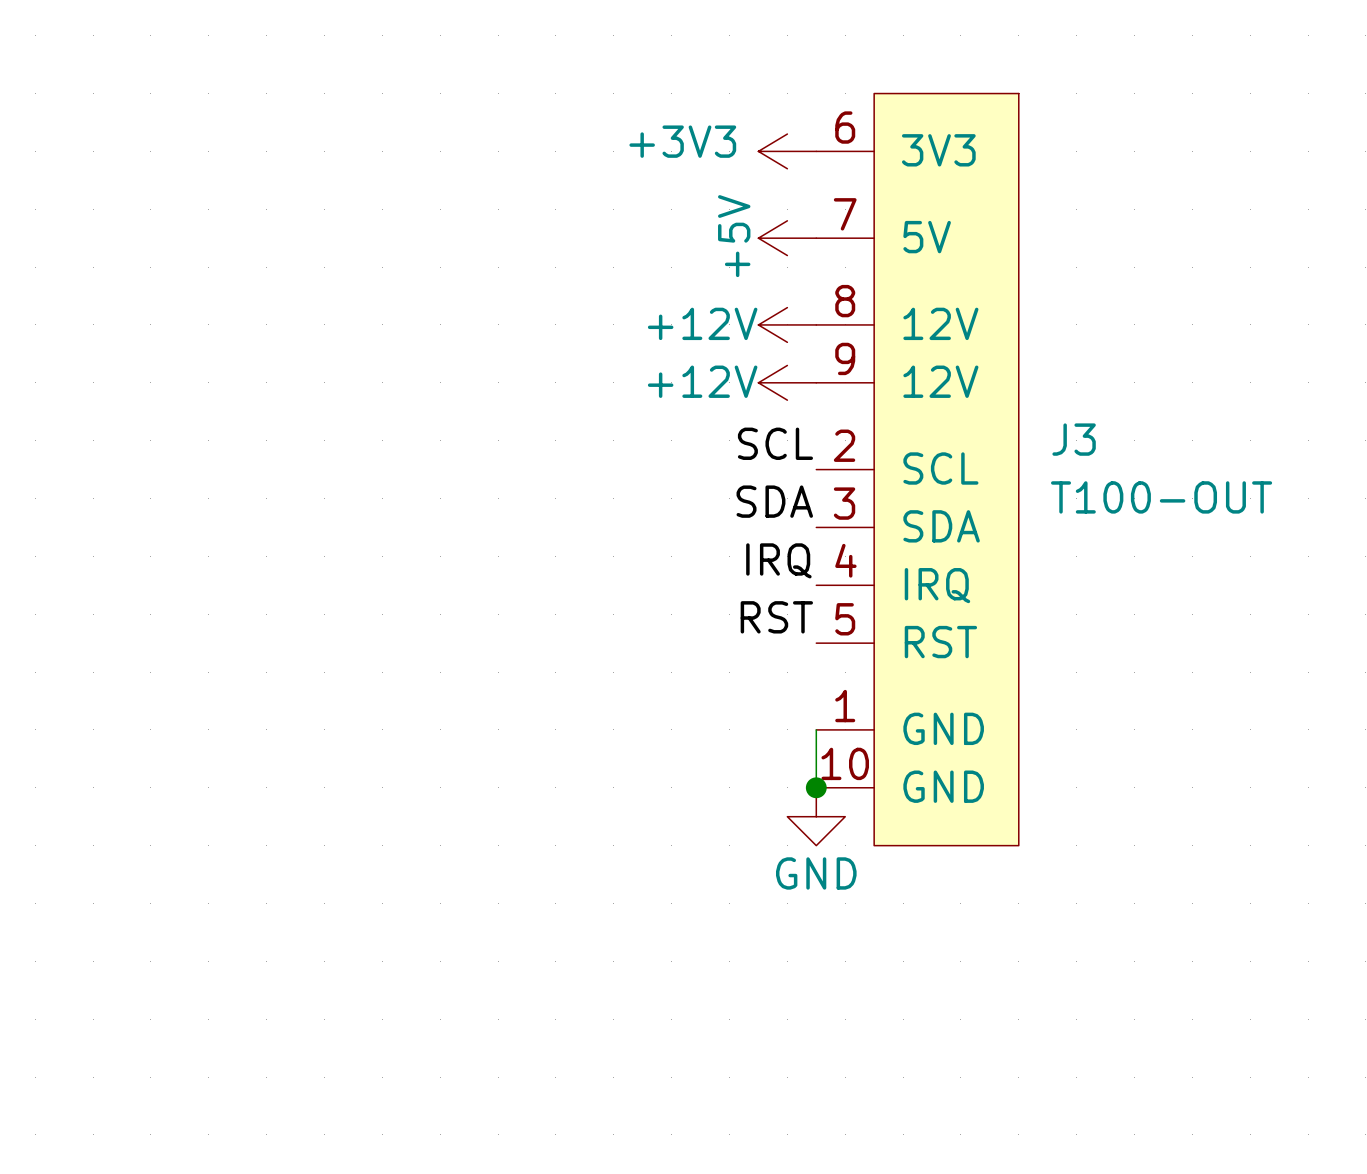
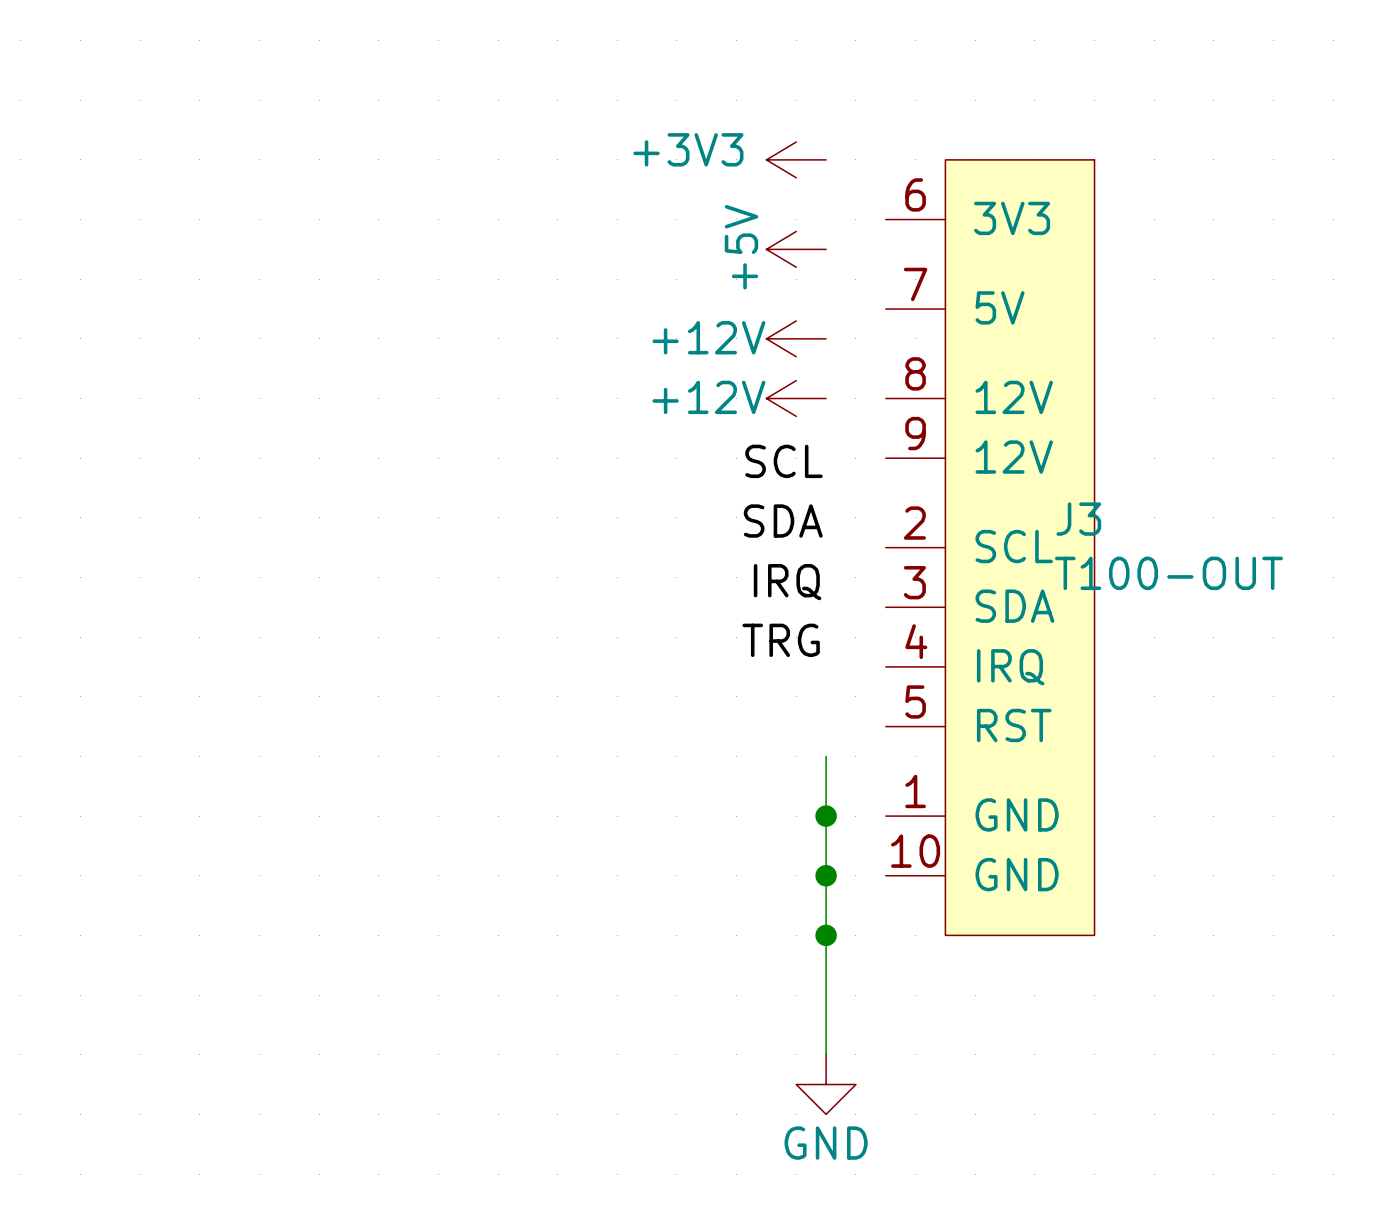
J3 name position: J3 (1074, 439) -> J3 (1078, 519)
J3 position: (917, 469) -> (990, 547)
J3 value position: T100-OUT (1161, 497) -> T100-OUT (1168, 573)
label: RST (776, 617) -> TRG (781, 640)
wire: none -> (826, 816) (826, 1054)
power symbol position: GND (816, 816) -> GND (826, 1084)
junction: none -> (826, 875)
junction: none -> (826, 935)

